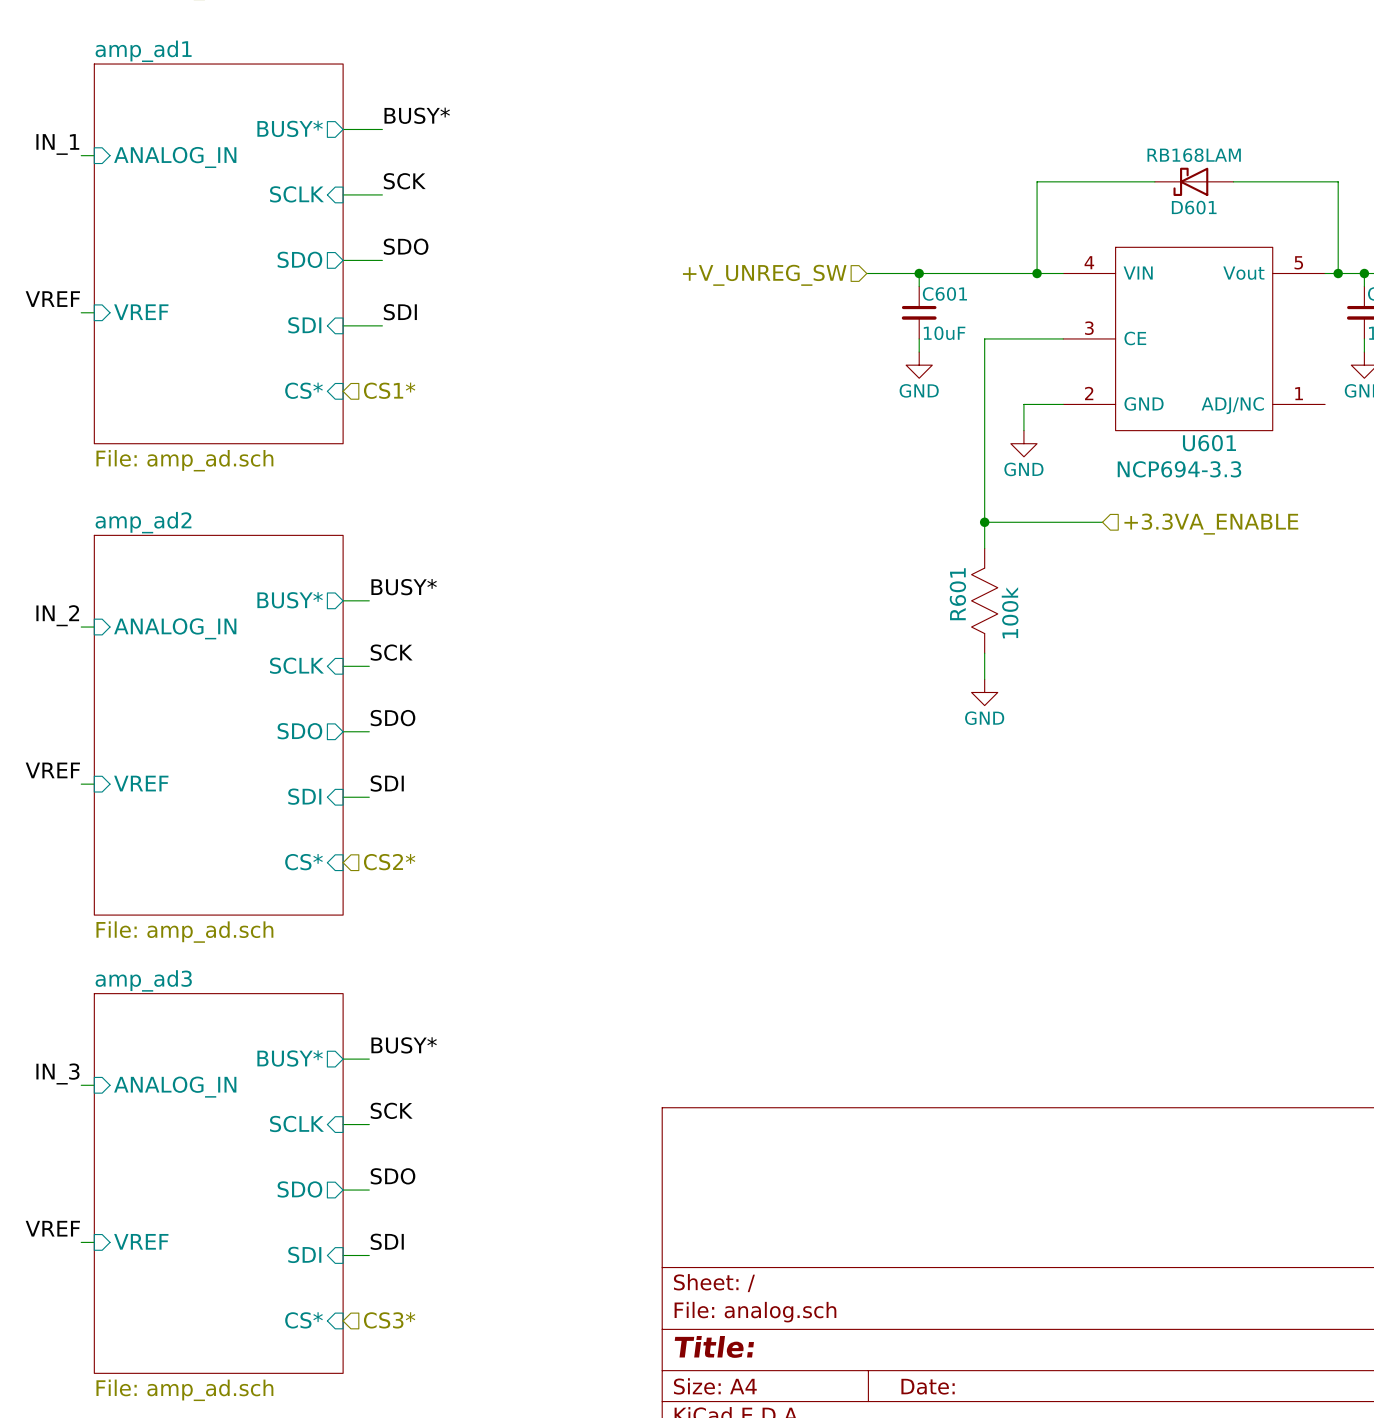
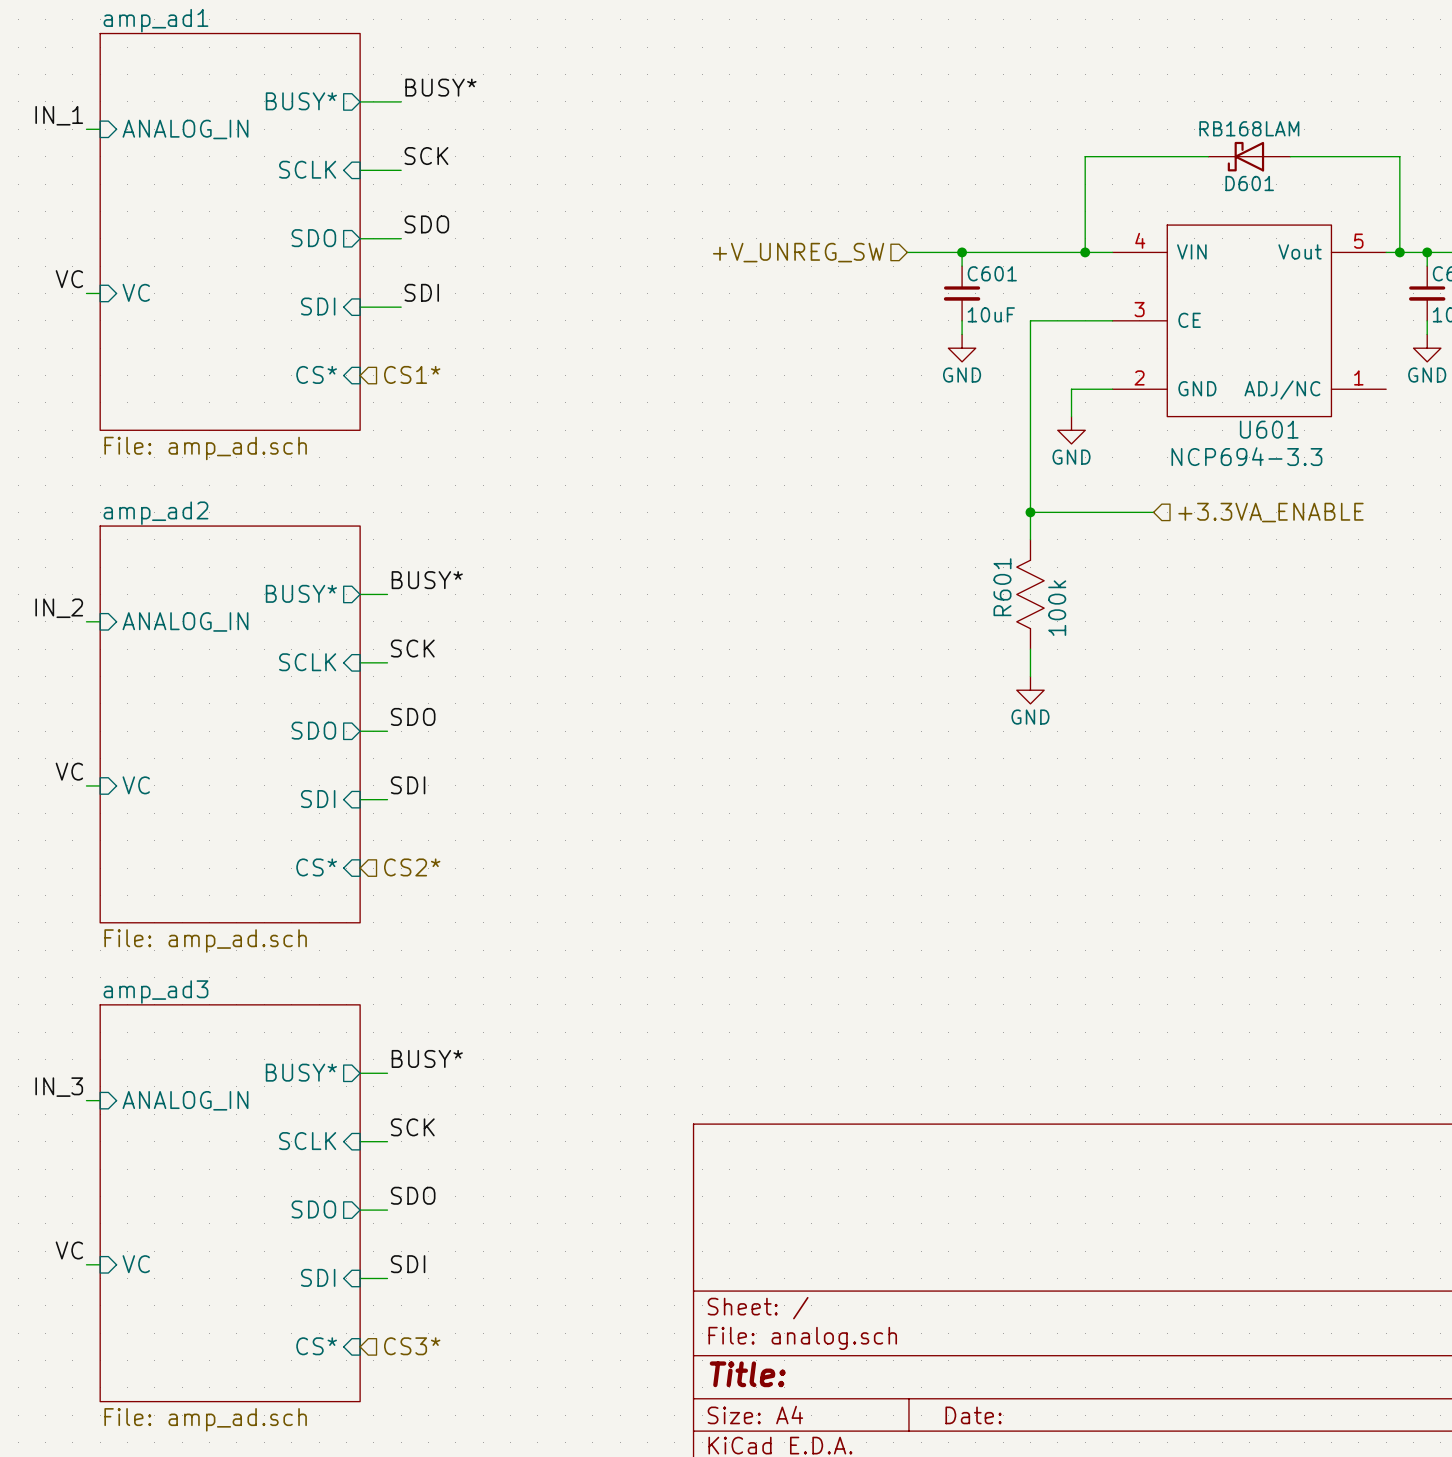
label: VREF (52, 299) -> VC (69, 279)
sheet pin: VREF (141, 312) -> VC (136, 292)
label: VREF (52, 770) -> VC (69, 771)
sheet pin: VREF (141, 783) -> VC (136, 785)
label: VREF (52, 1228) -> VC (69, 1250)
sheet pin: VREF (141, 1241) -> VC (136, 1264)

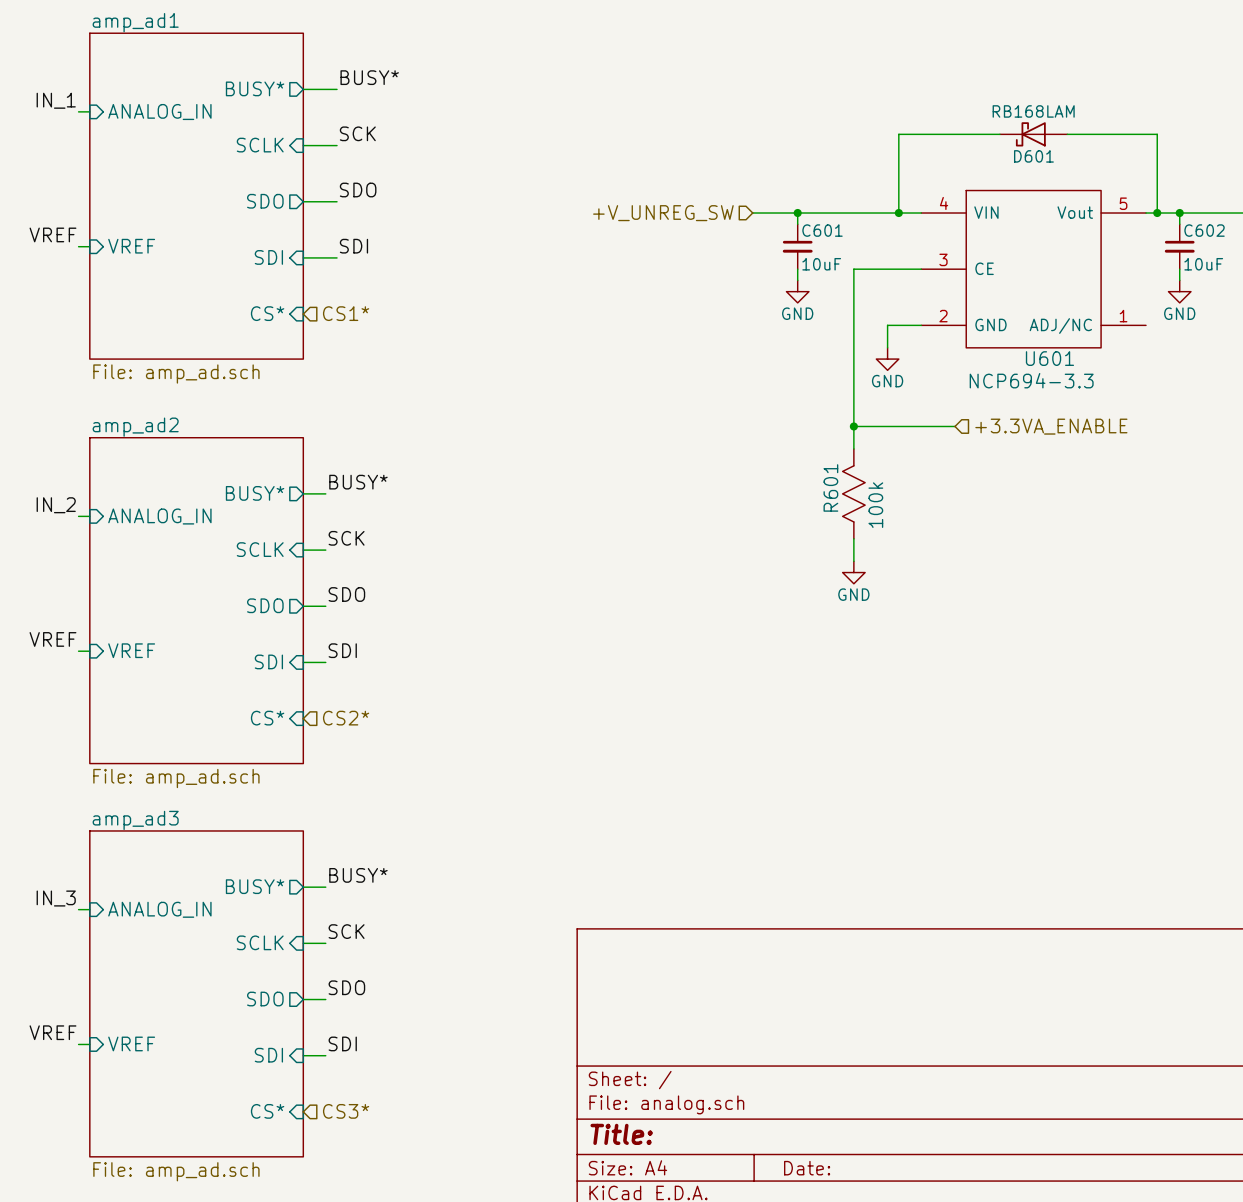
label: VC (69, 279) -> VREF (52, 234)
sheet pin: VC (136, 292) -> VREF (131, 246)
label: VC (69, 771) -> VREF (52, 639)
sheet pin: VC (136, 785) -> VREF (131, 650)
label: VC (69, 1250) -> VREF (52, 1032)
sheet pin: VC (136, 1264) -> VREF (131, 1043)

